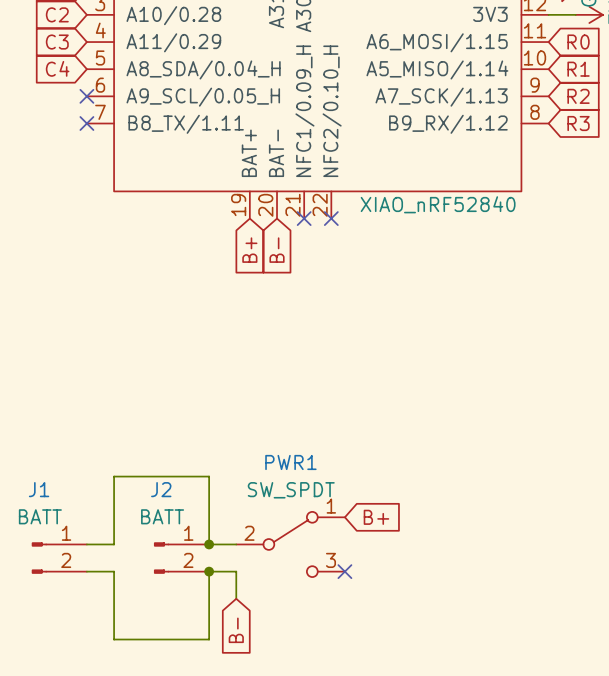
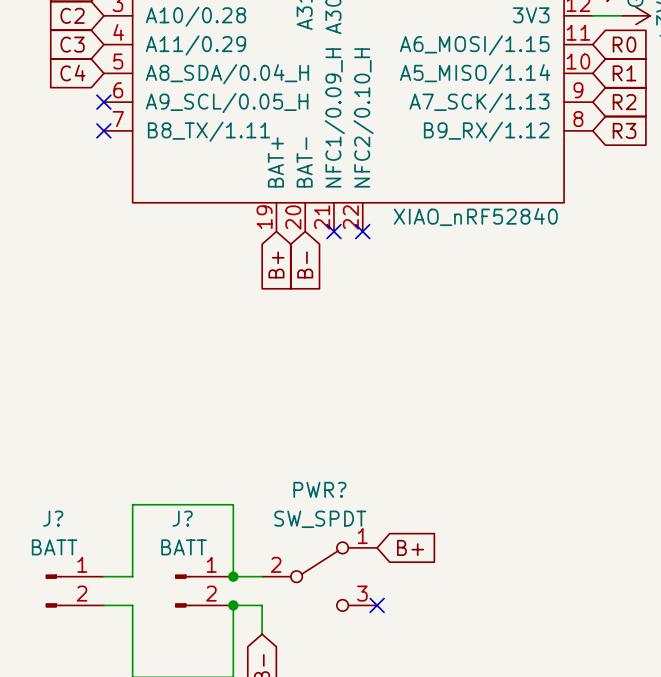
PWR1 name: PWR1 (290, 462) -> PWR? (319, 489)
J1 name: J1 (39, 489) -> J? (53, 518)
J2 name: J2 (161, 489) -> J? (182, 518)

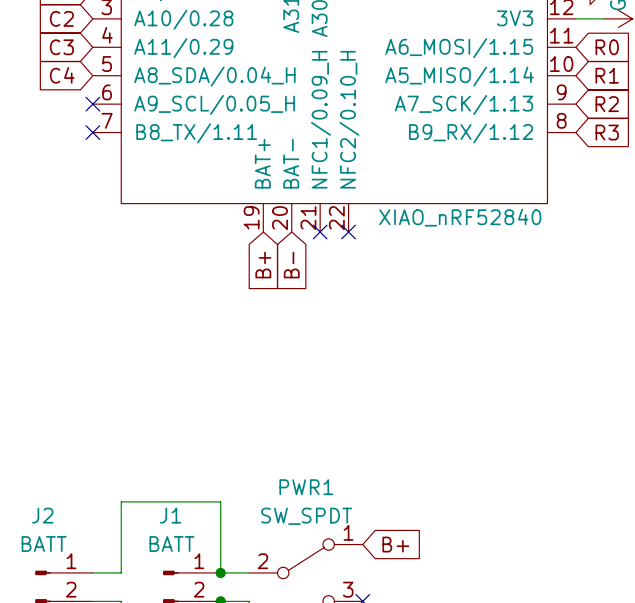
PWR? name: PWR? (319, 489) -> PWR1 (306, 487)
J? name: J? (53, 518) -> J2 (42, 515)
J? name: J? (182, 518) -> J1 (170, 515)

